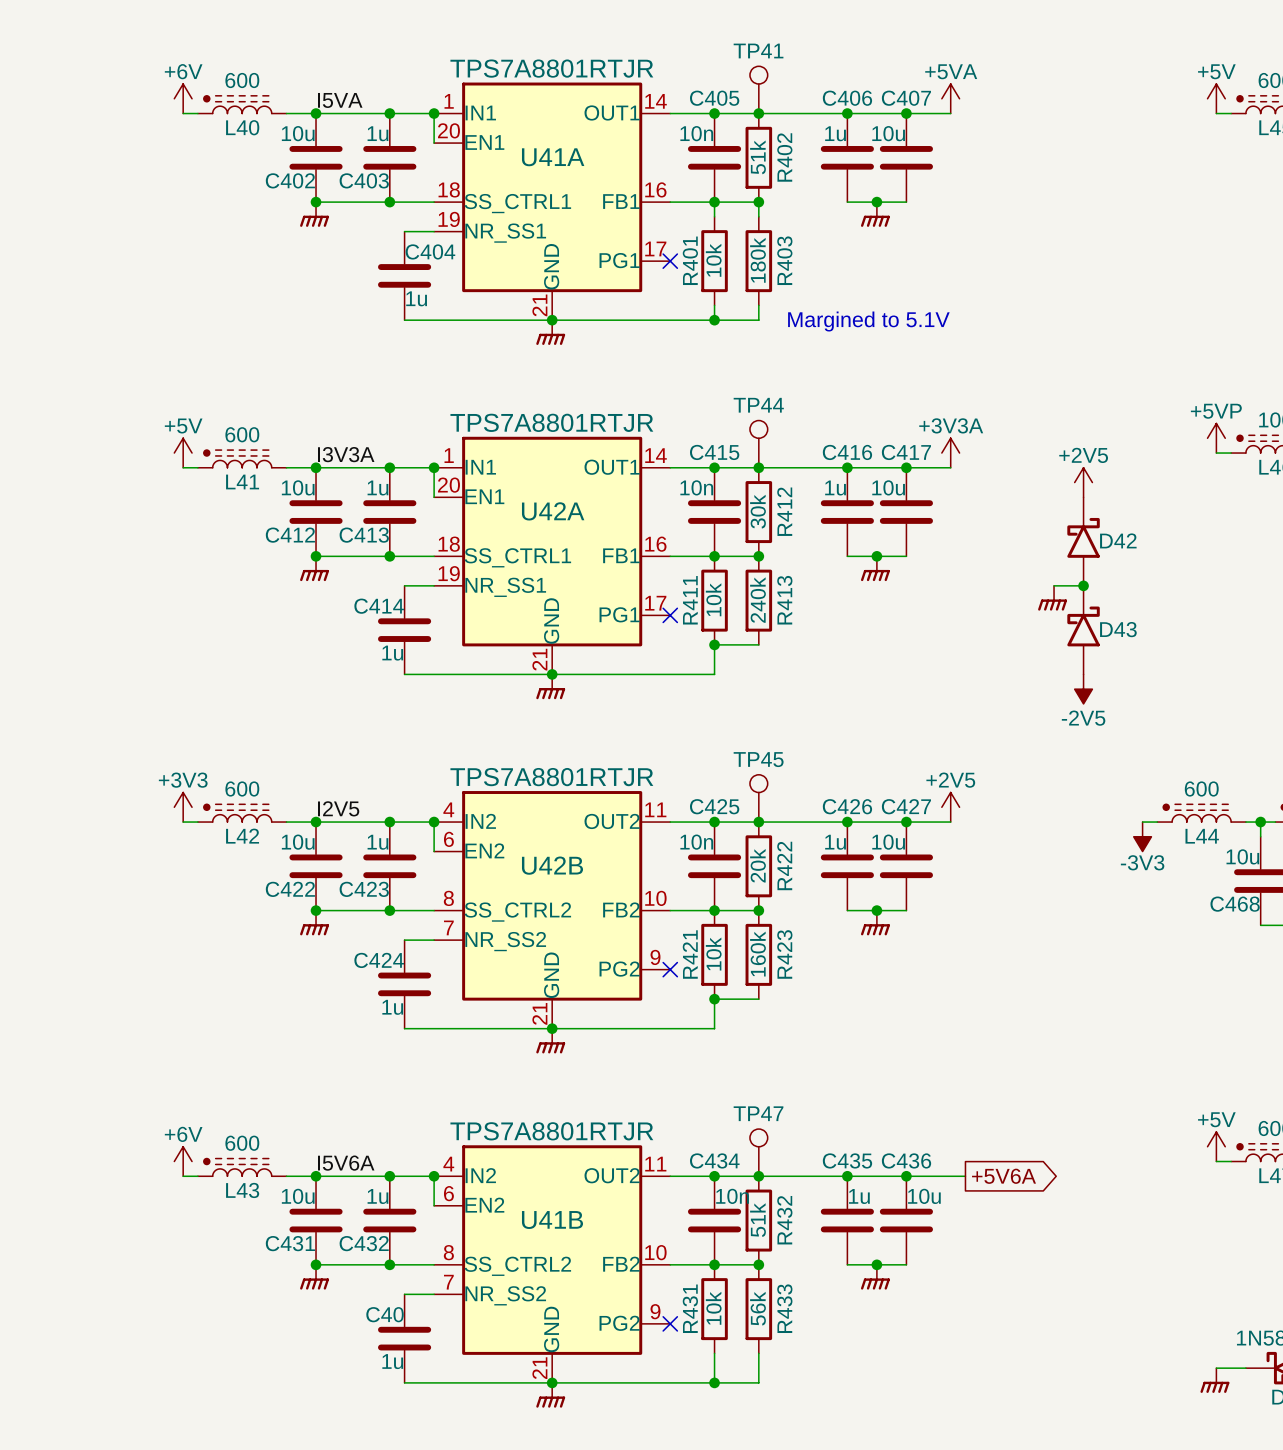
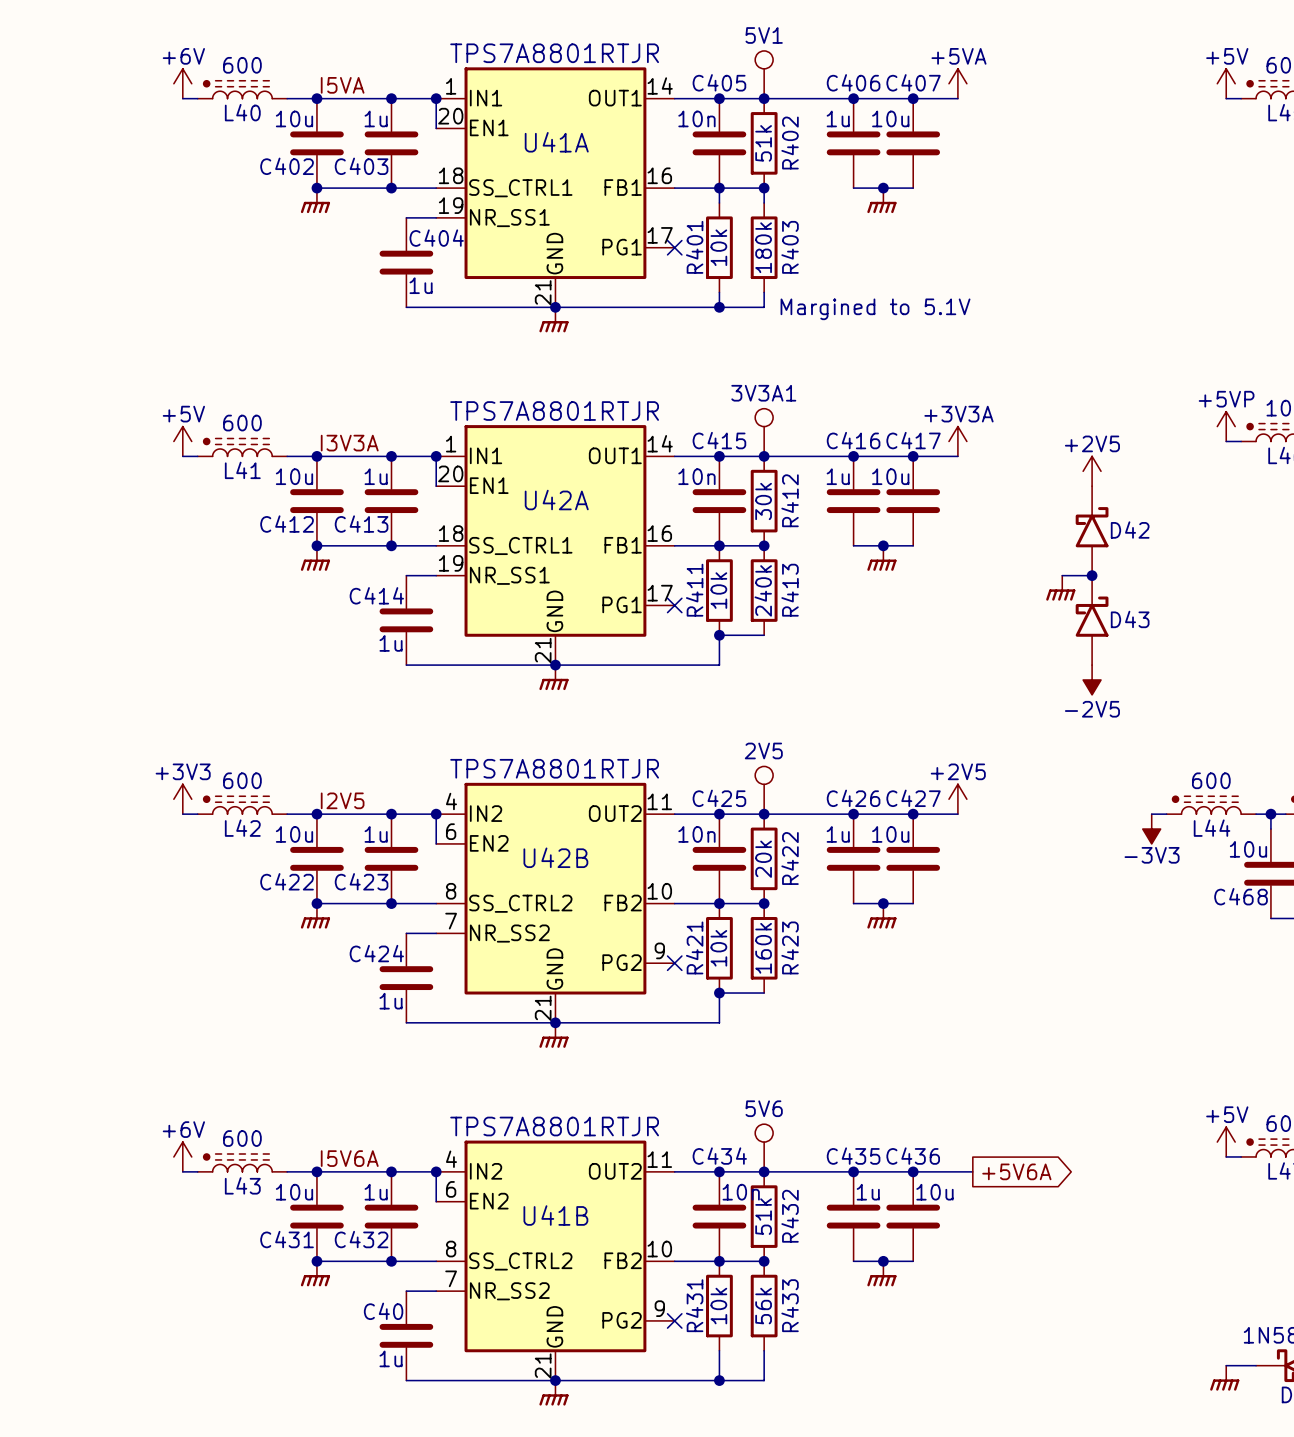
TP41 name: TP41 (758, 50) -> 5V1 (764, 35)
TP44 name: TP44 (758, 405) -> 3V3A1 (763, 393)
TP45 name: TP45 (758, 759) -> 2V5 (763, 750)
TP47 name: TP47 (758, 1113) -> 5V6 (764, 1108)

